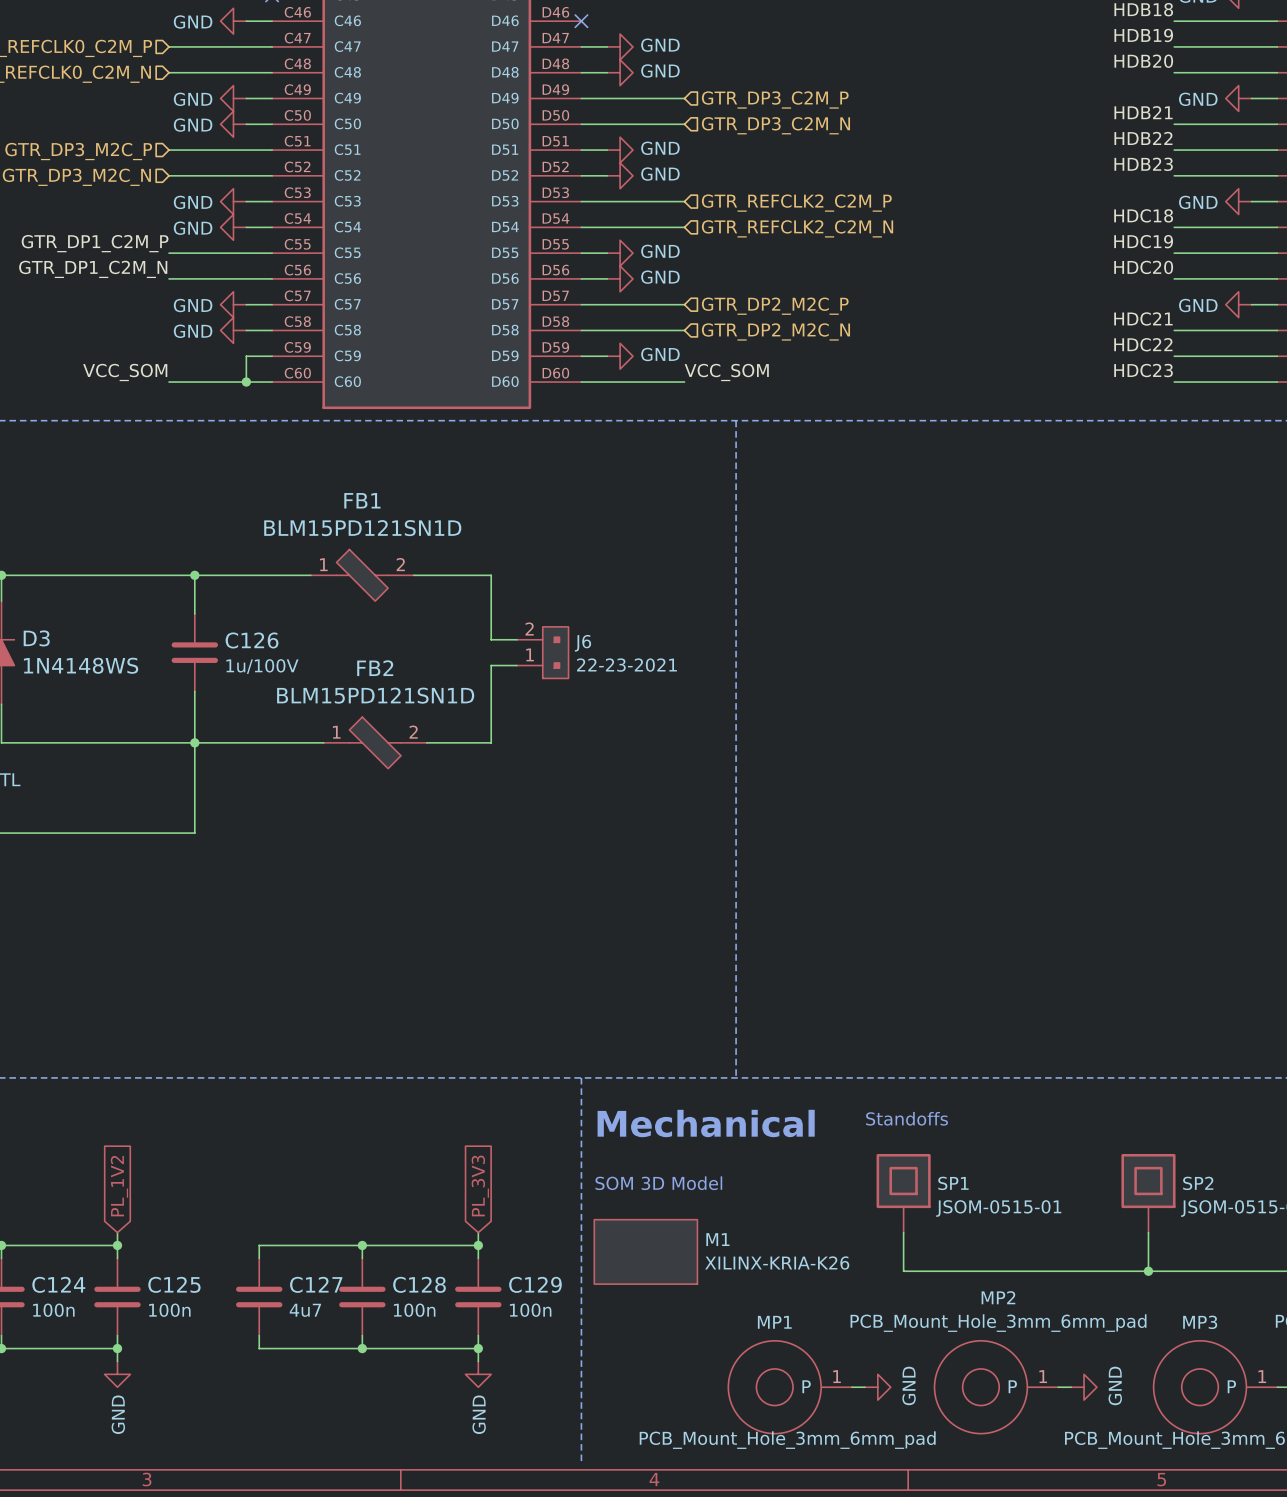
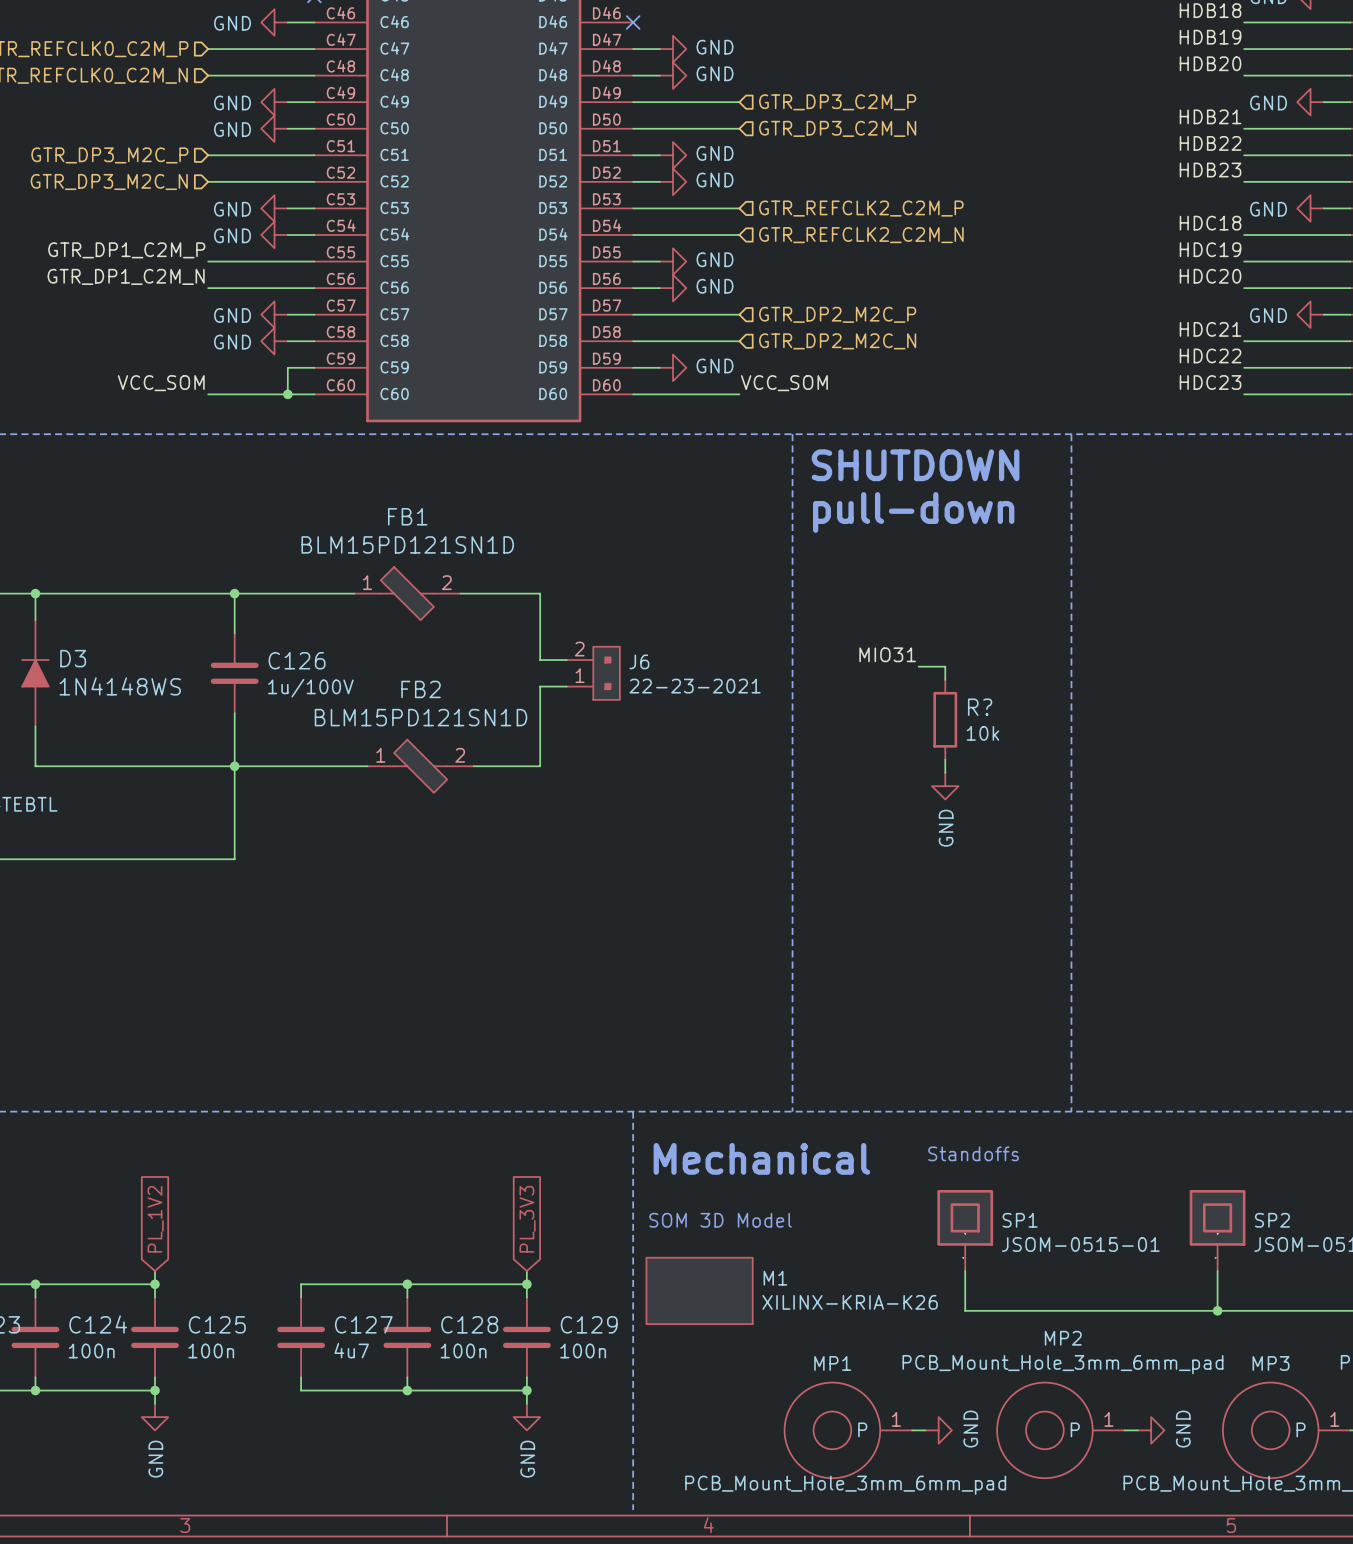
line: none -> (1071, 434) (1071, 1111)
text: none -> SHUTDOWN (915, 465)
text: none -> pull-down (913, 512)
label: none -> MIO31 (887, 654)
wire: none -> (918, 666) (945, 666) (945, 679)
R?: none -> (945, 719)
wire: none -> (945, 759) (945, 772)
power symbol: none -> GND (945, 786)

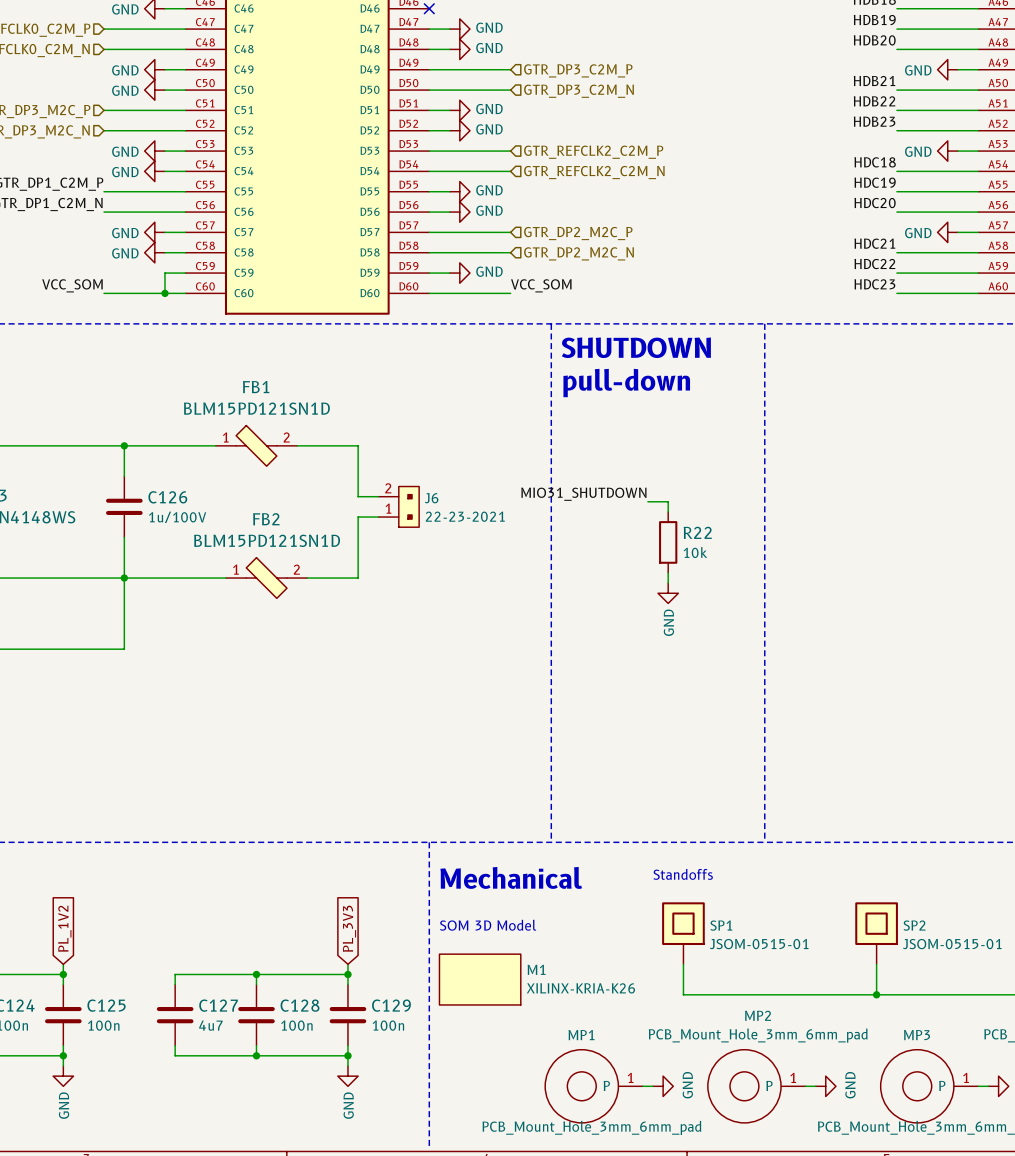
label: MIO31 (887, 654) -> MIO31_SHUTDOWN (583, 494)
R? name: R? (980, 707) -> R22 (697, 532)

